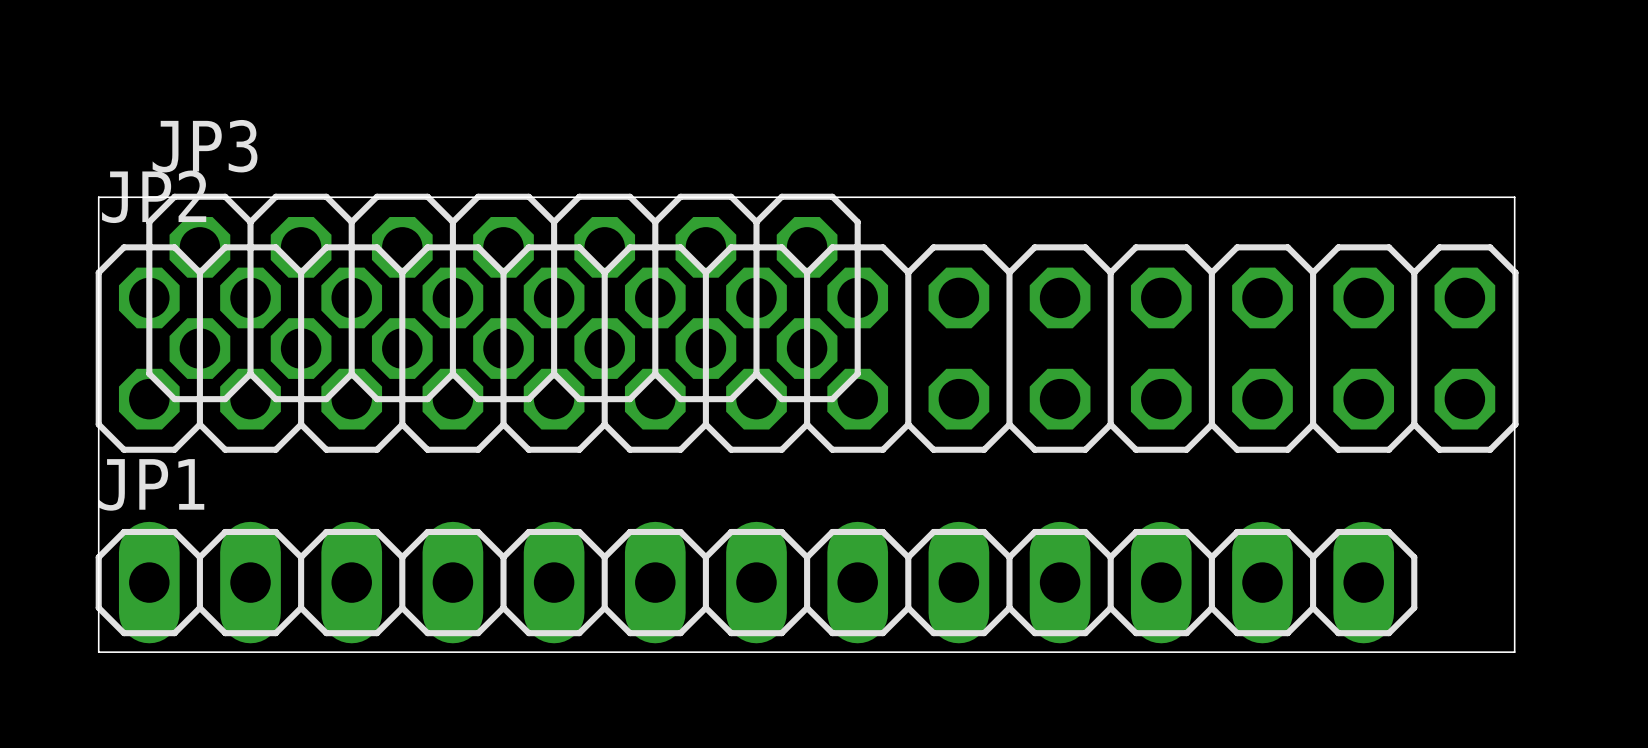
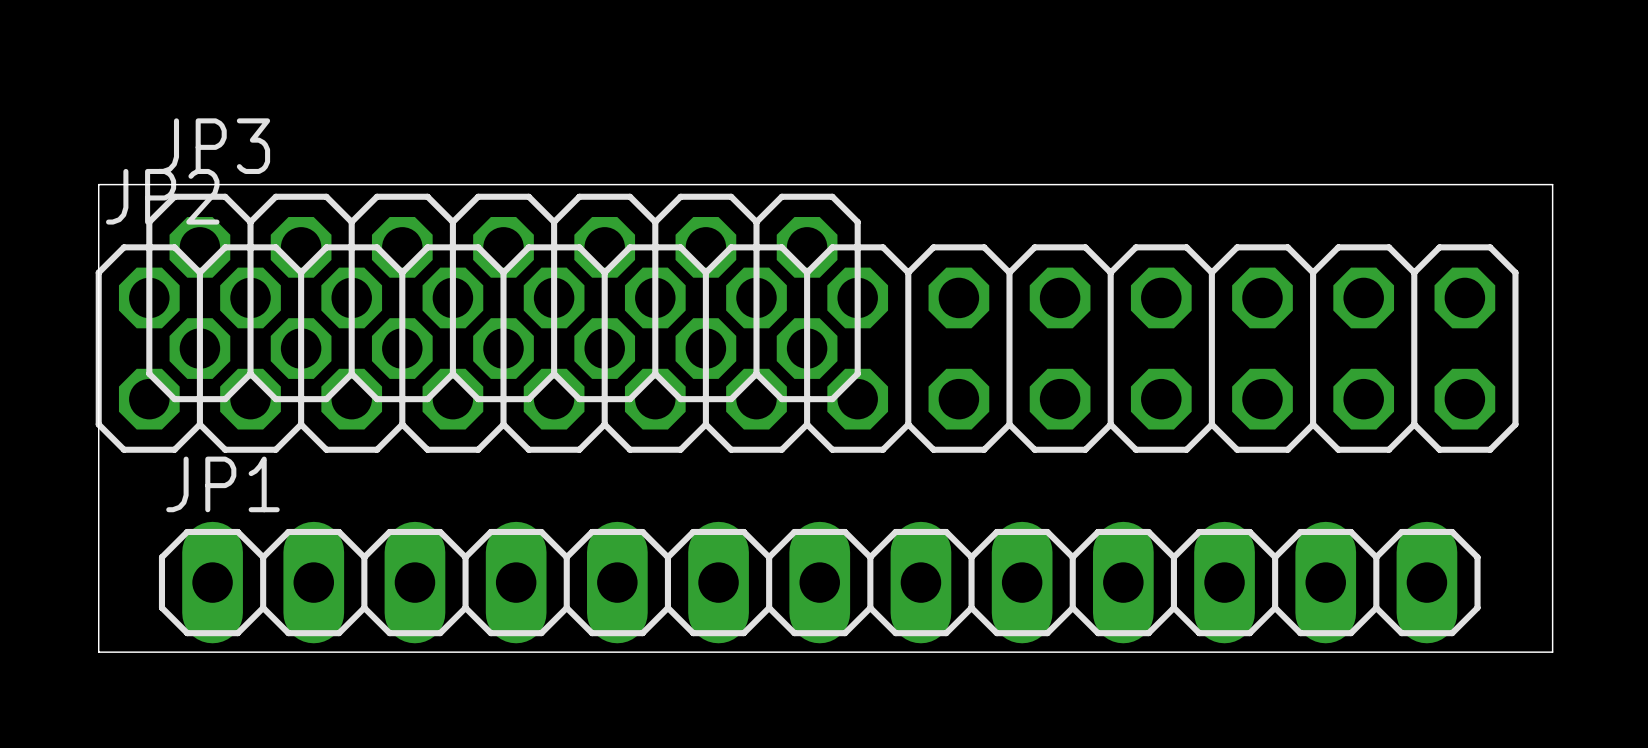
board edge: (98, 197) (1514, 197) (1514, 652) -> (98, 197) (98, 184) (1552, 184) (1552, 652) (1514, 652)
JP1 position: (756, 582) -> (819, 582)

